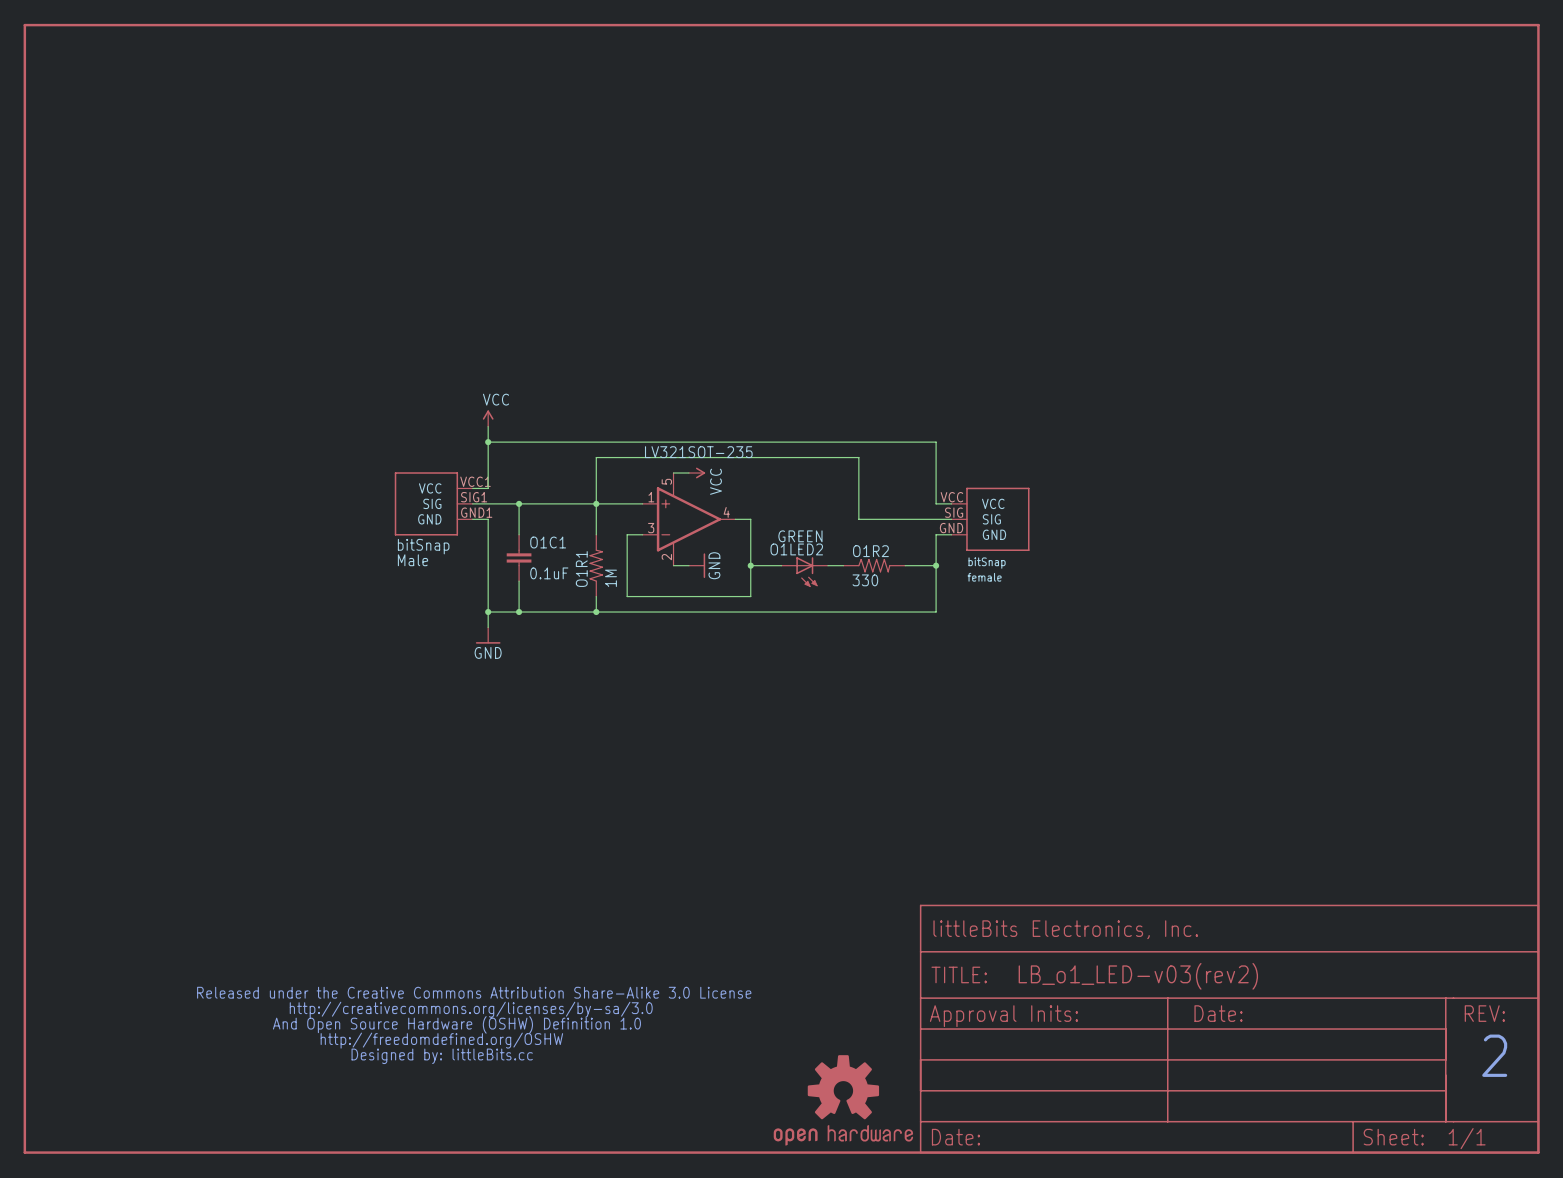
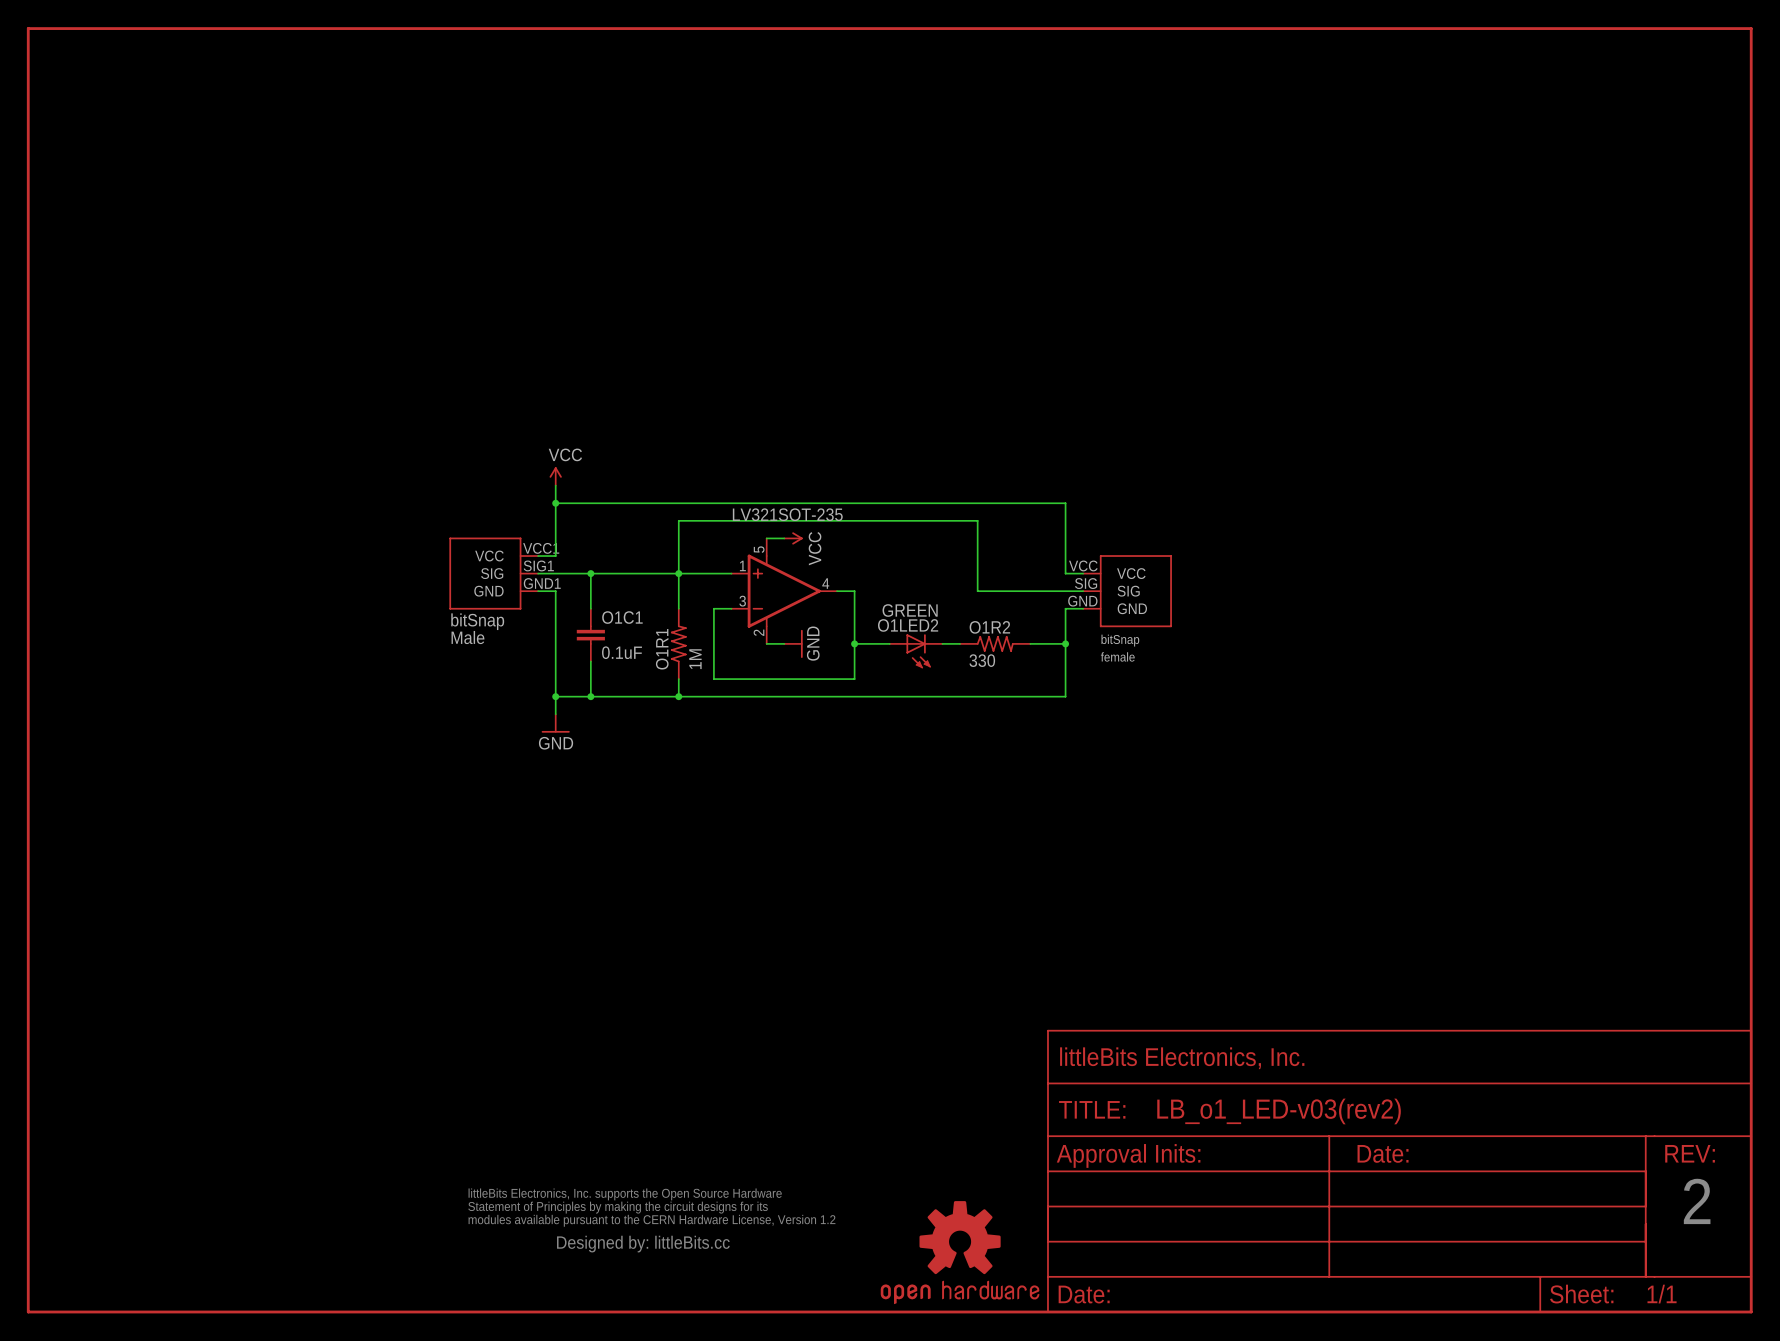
part: (474, 1025) -> none
part: none -> (651, 1220)

